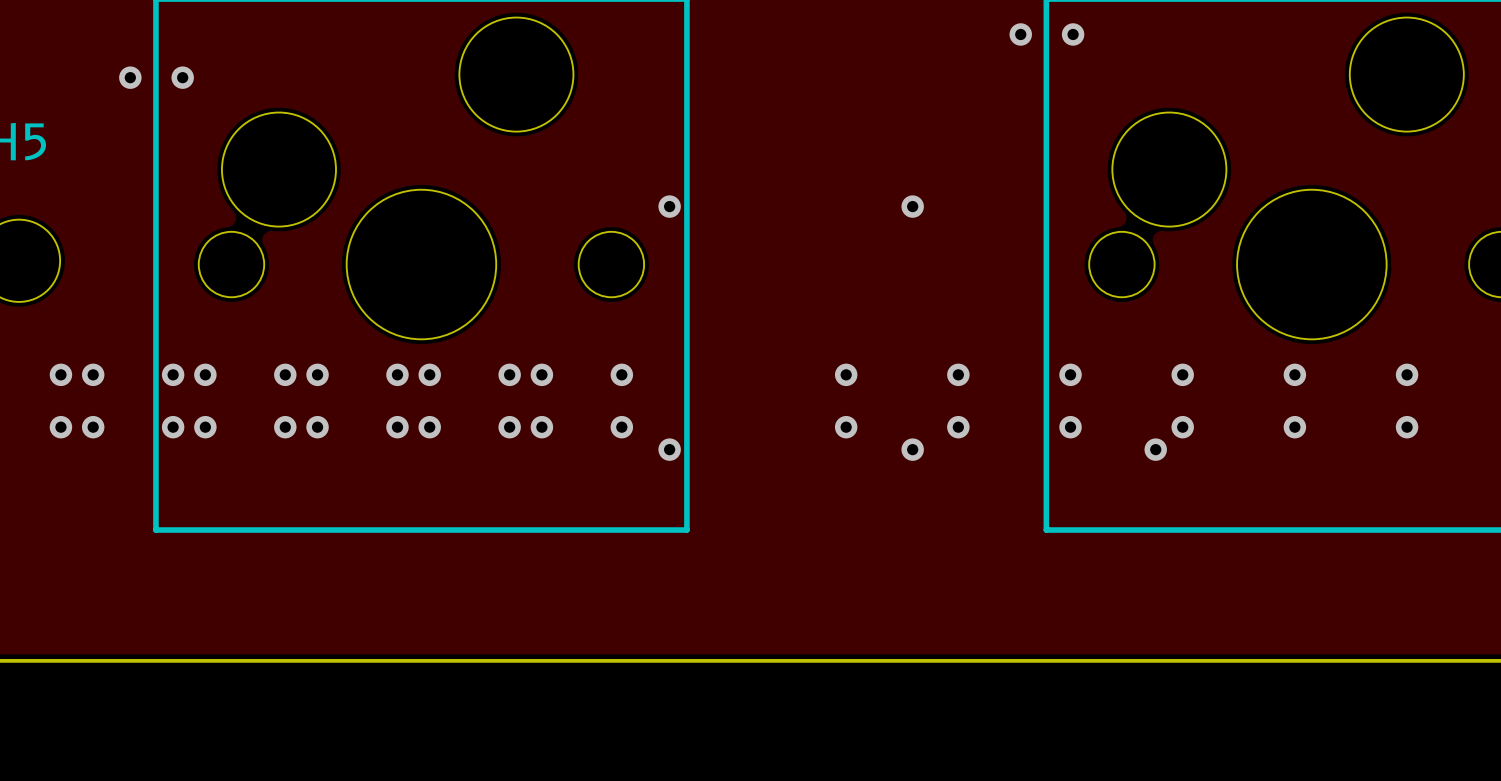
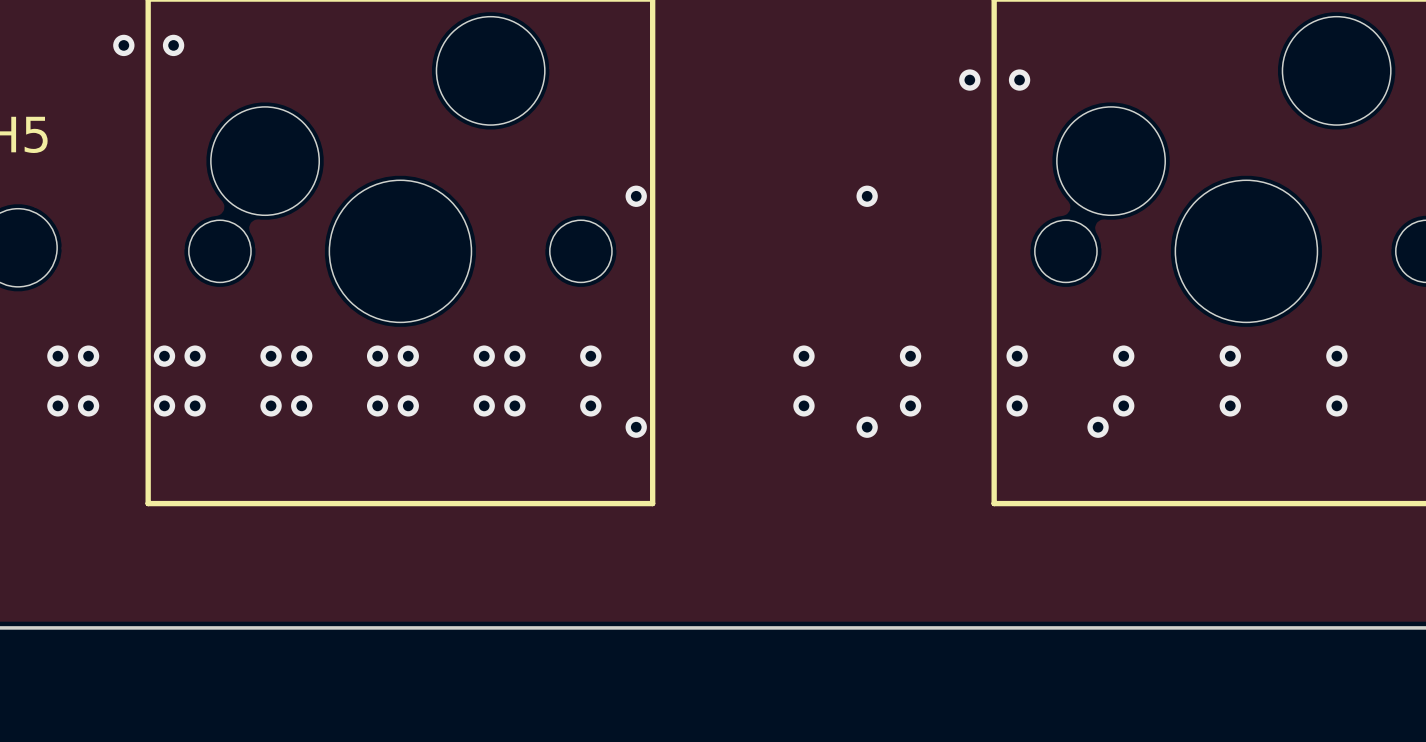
via: (1020, 34) -> none
via: (1073, 34) -> none
via: none -> (123, 45)
via: none -> (173, 45)
via: (130, 77) -> none
via: (182, 77) -> none
via: none -> (969, 80)
via: none -> (1019, 80)

